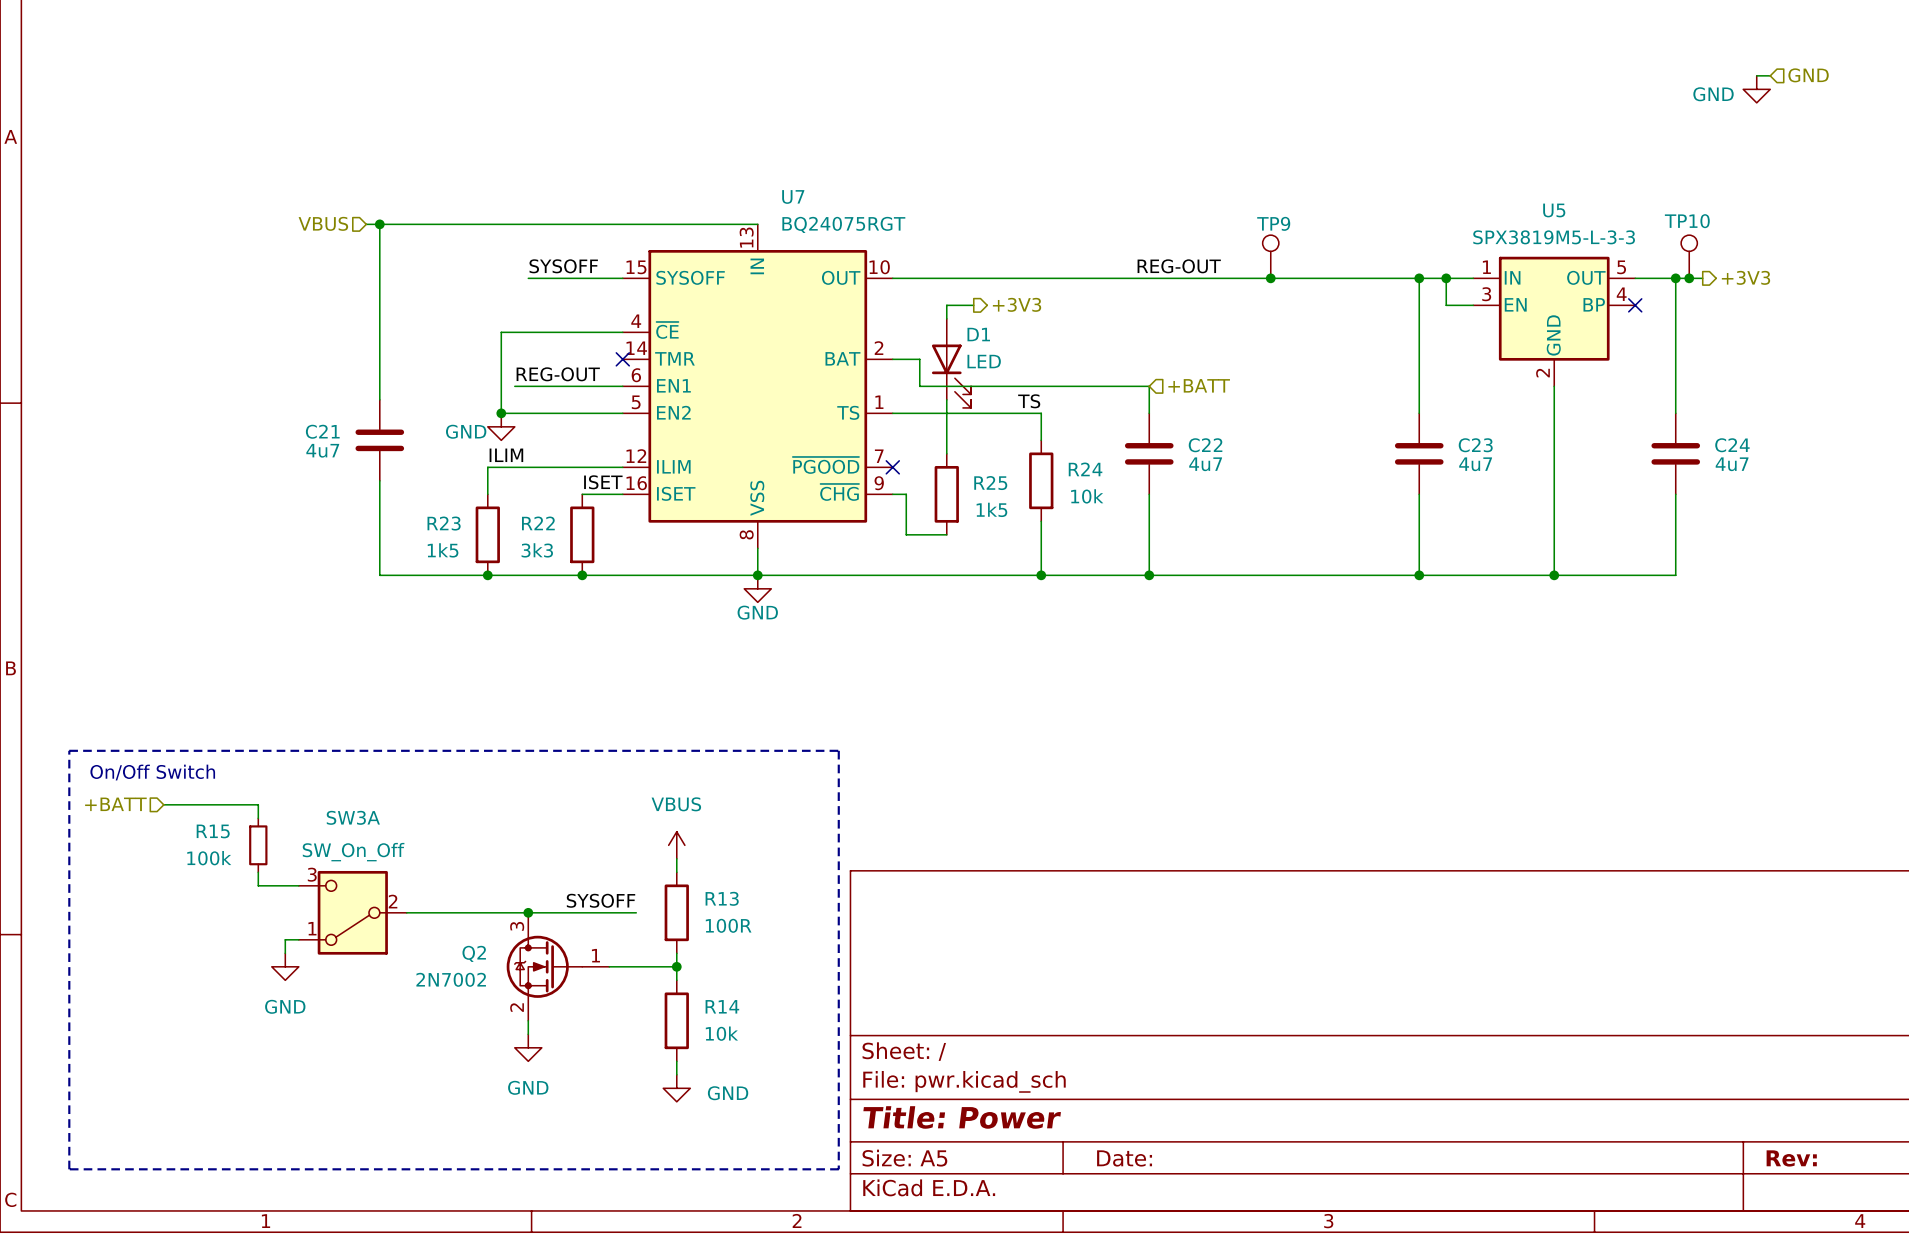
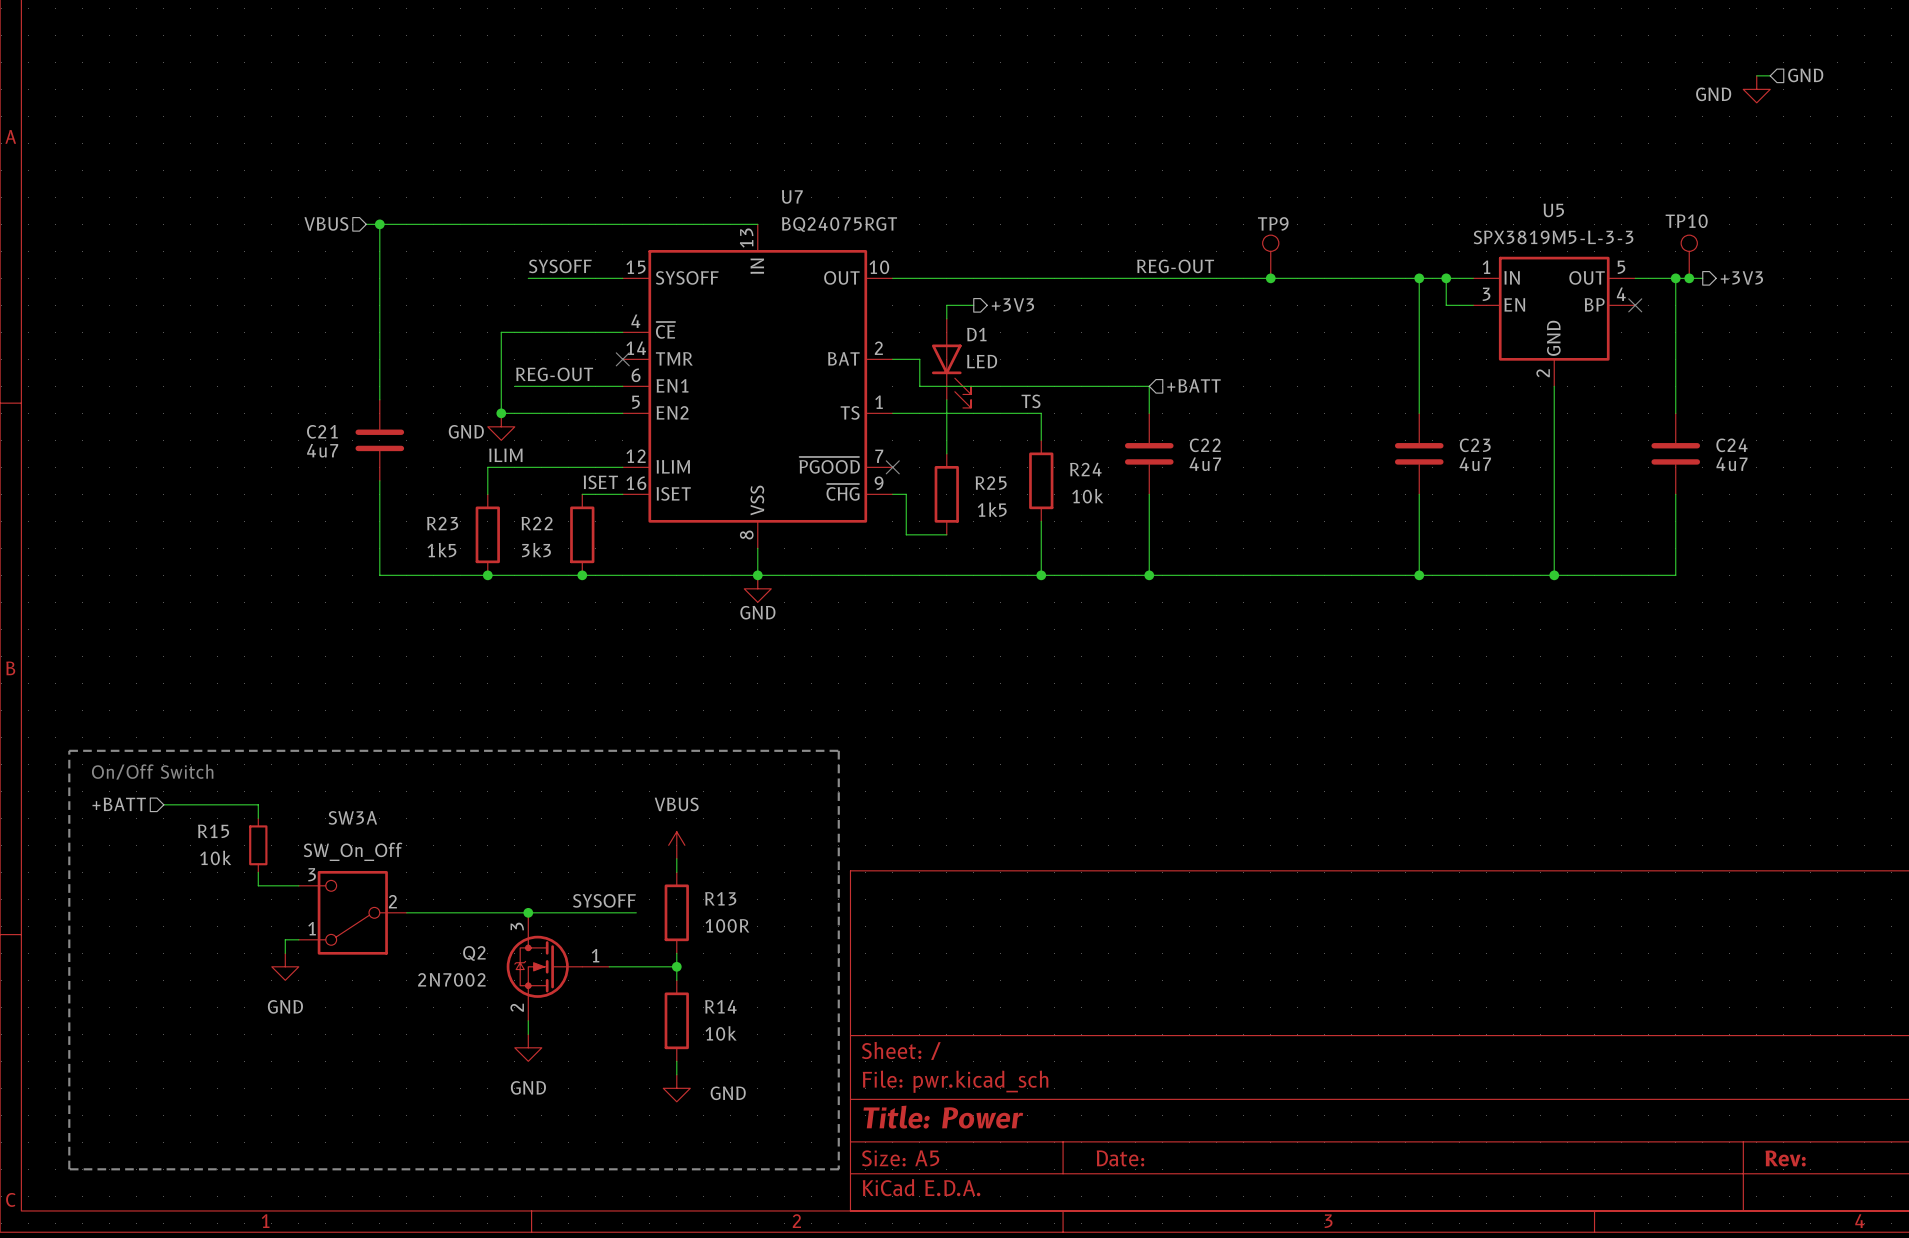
R15 value: 100k (209, 858) -> 10k (215, 857)

